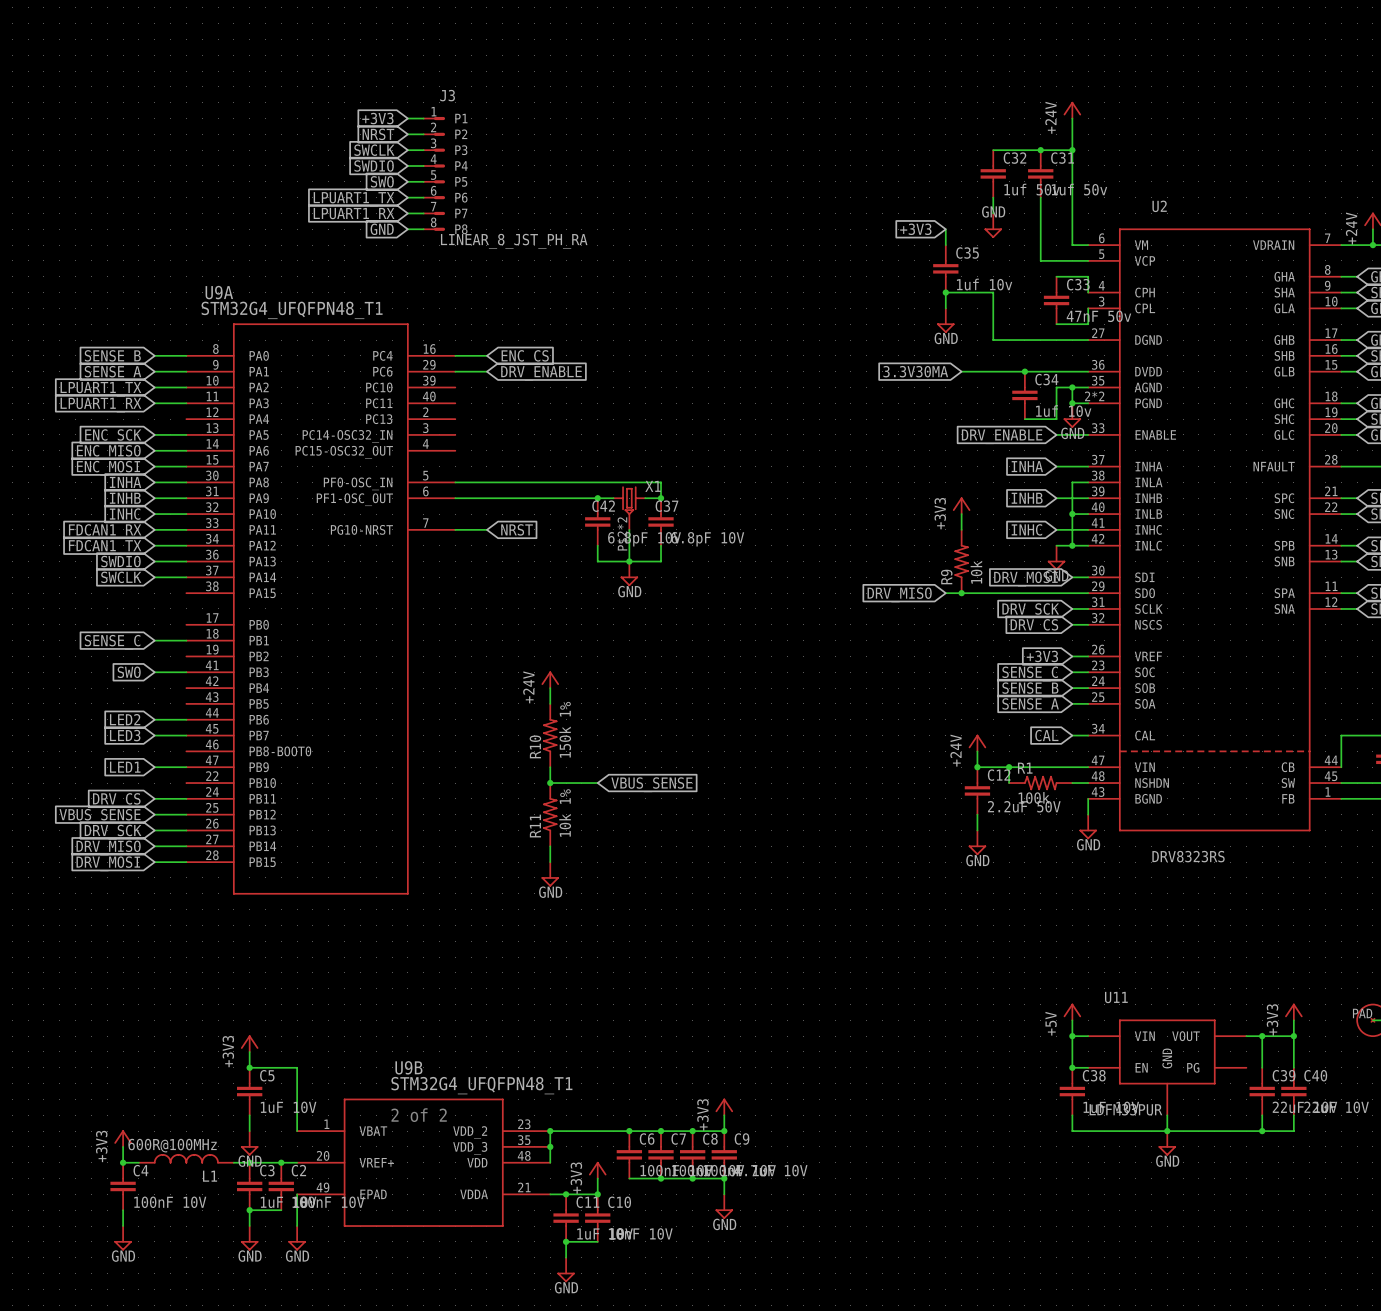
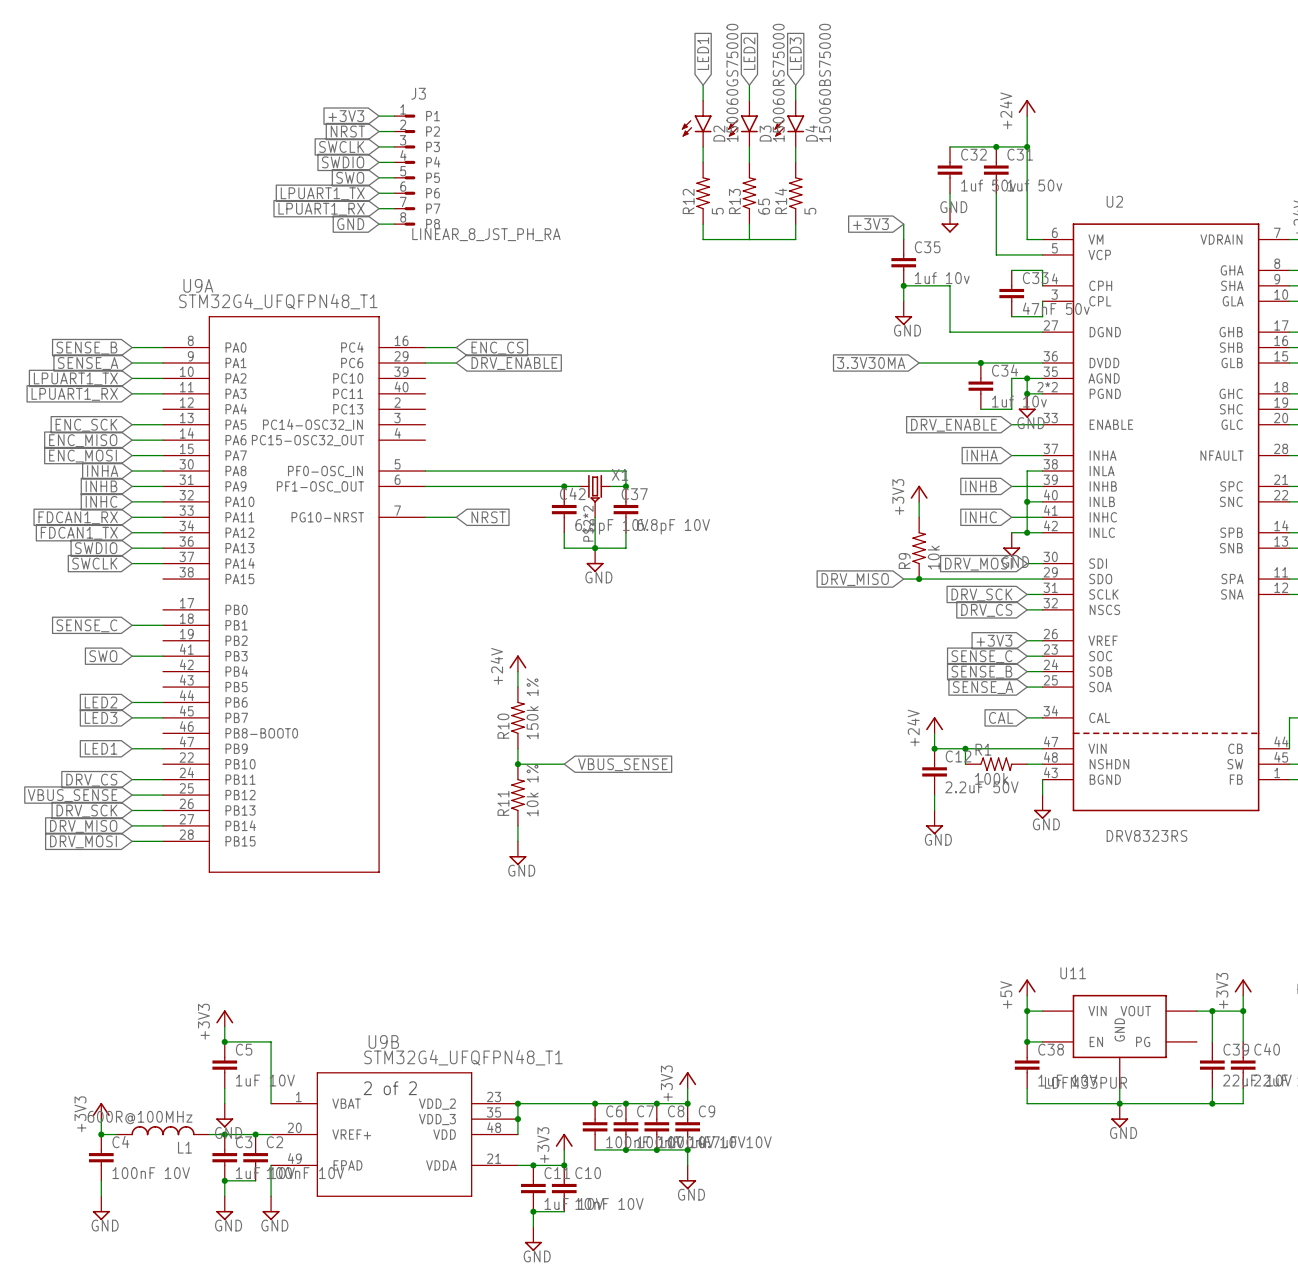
global label: none -> LED1 (703, 53)
global label: none -> LED3 (795, 53)
global label: none -> LED2 (749, 53)
wire: none -> (703, 85) (703, 100)
wire: none -> (749, 85) (749, 100)
wire: none -> (795, 85) (795, 100)
D2: none -> 150060GS75000 (696, 123)
D3: none -> 150060RS75000 (743, 123)
D4: none -> 150060BS75000 (789, 123)
wire: none -> (703, 146) (703, 162)
wire: none -> (749, 146) (749, 162)
wire: none -> (795, 146) (795, 162)
R12: none -> 5 (703, 193)
R13: none -> 65 (749, 193)
R14: none -> 5 (795, 193)
wire: none -> (703, 224) (703, 239) (795, 239) (795, 224)
wire: none -> (749, 224) (749, 239)

